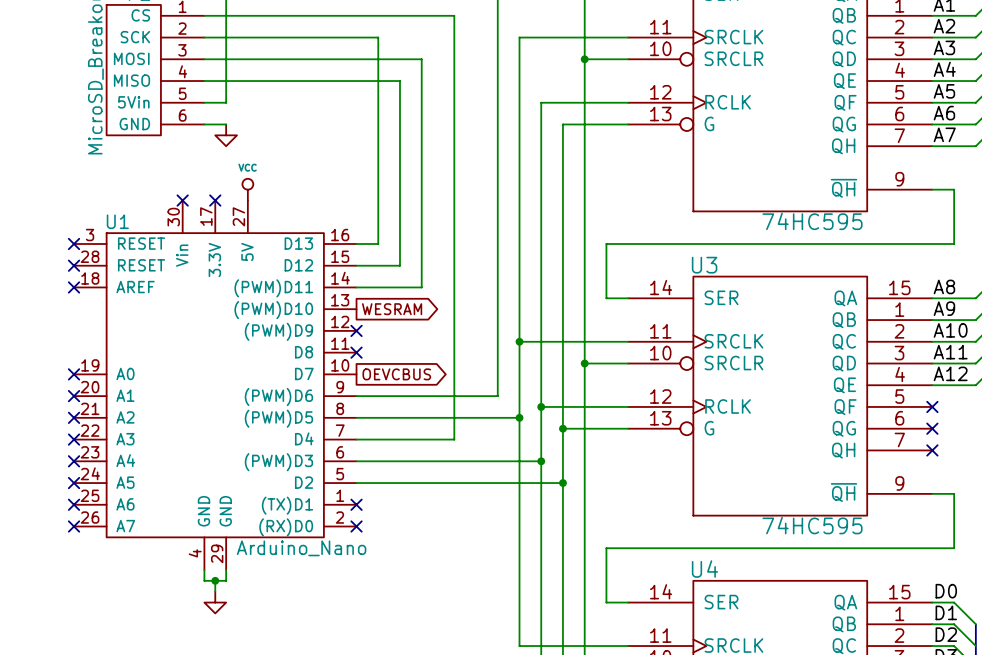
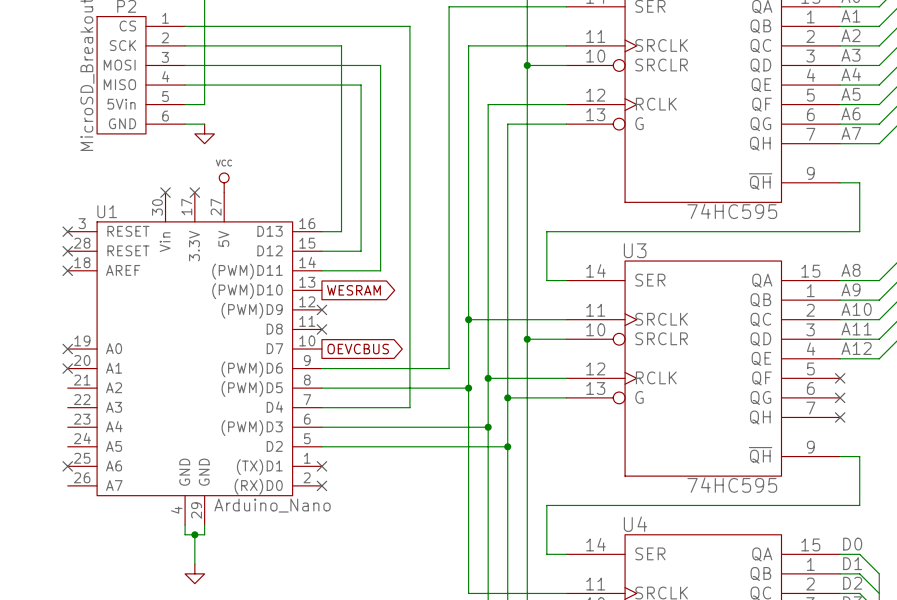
no-connect mark: (74, 417) -> none
no-connect mark: (74, 439) -> none
no-connect mark: (74, 461) -> none
no-connect mark: (74, 483) -> none
no-connect mark: (74, 526) -> none
power symbol position: (215, 602) -> (194, 573)

